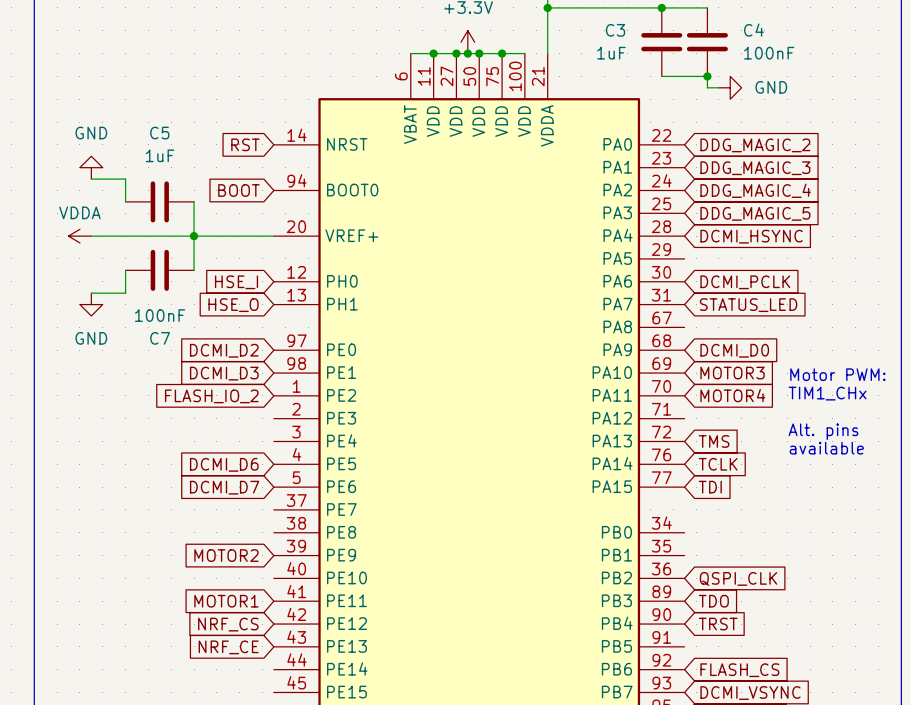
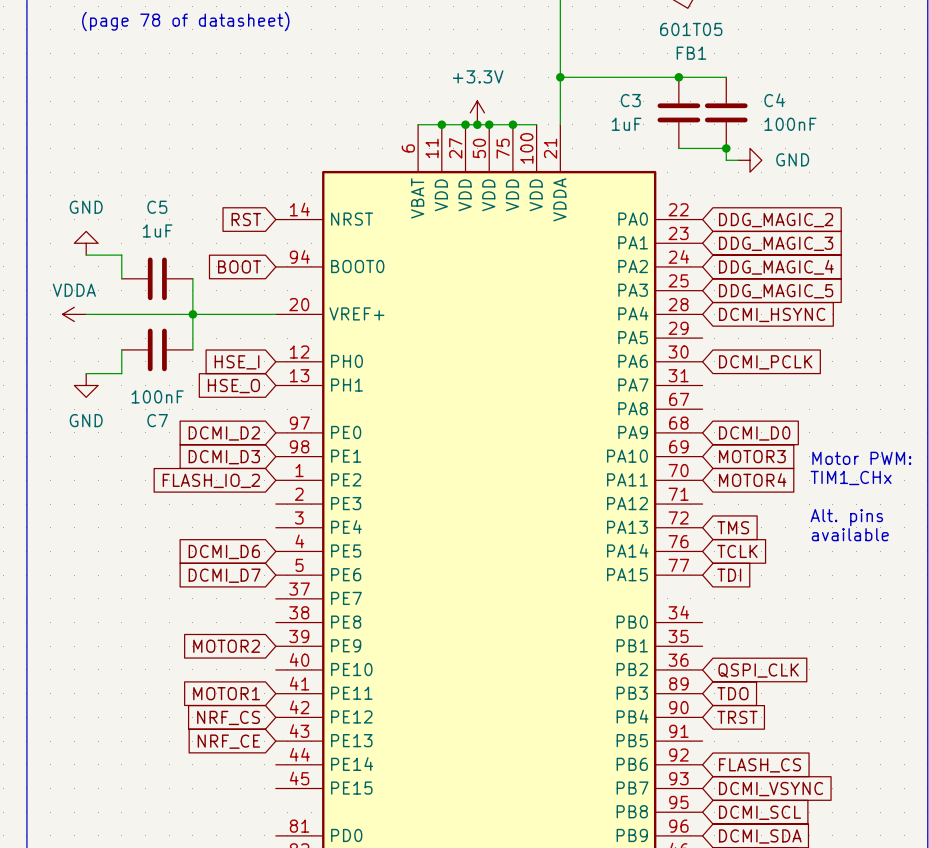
global label: STATUS_LED (748, 305) -> none

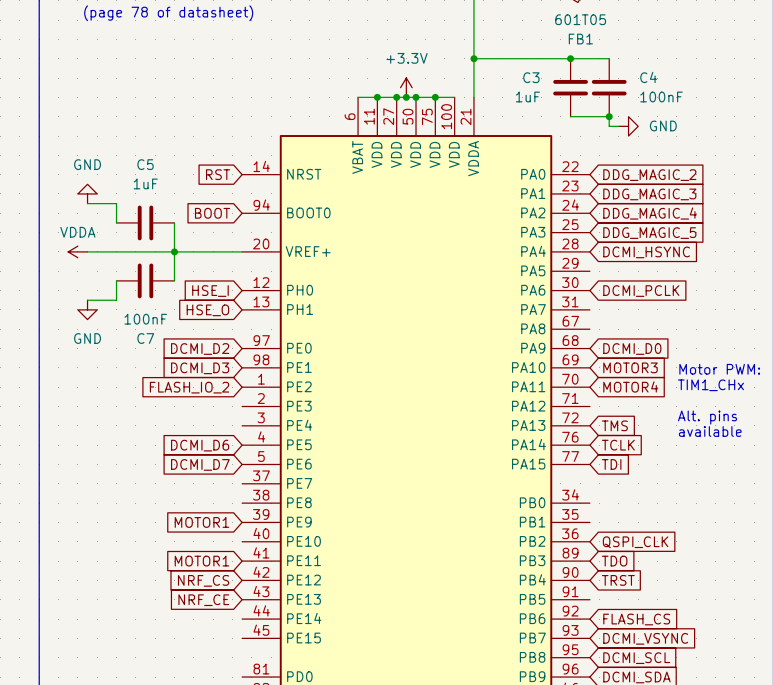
global label: MOTOR2 (226, 646) -> MOTOR1 (201, 522)

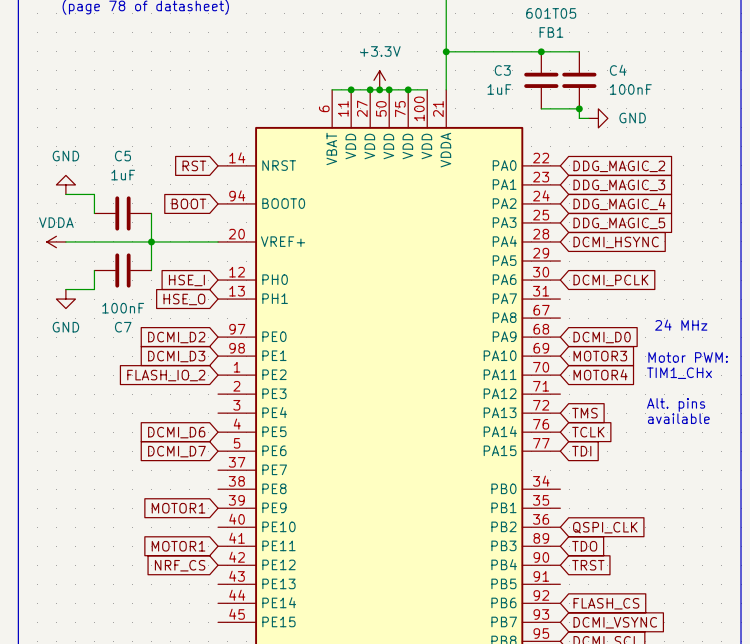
text: none -> 24 MHz (681, 325)
global label: NRF_CE (203, 600) -> none

